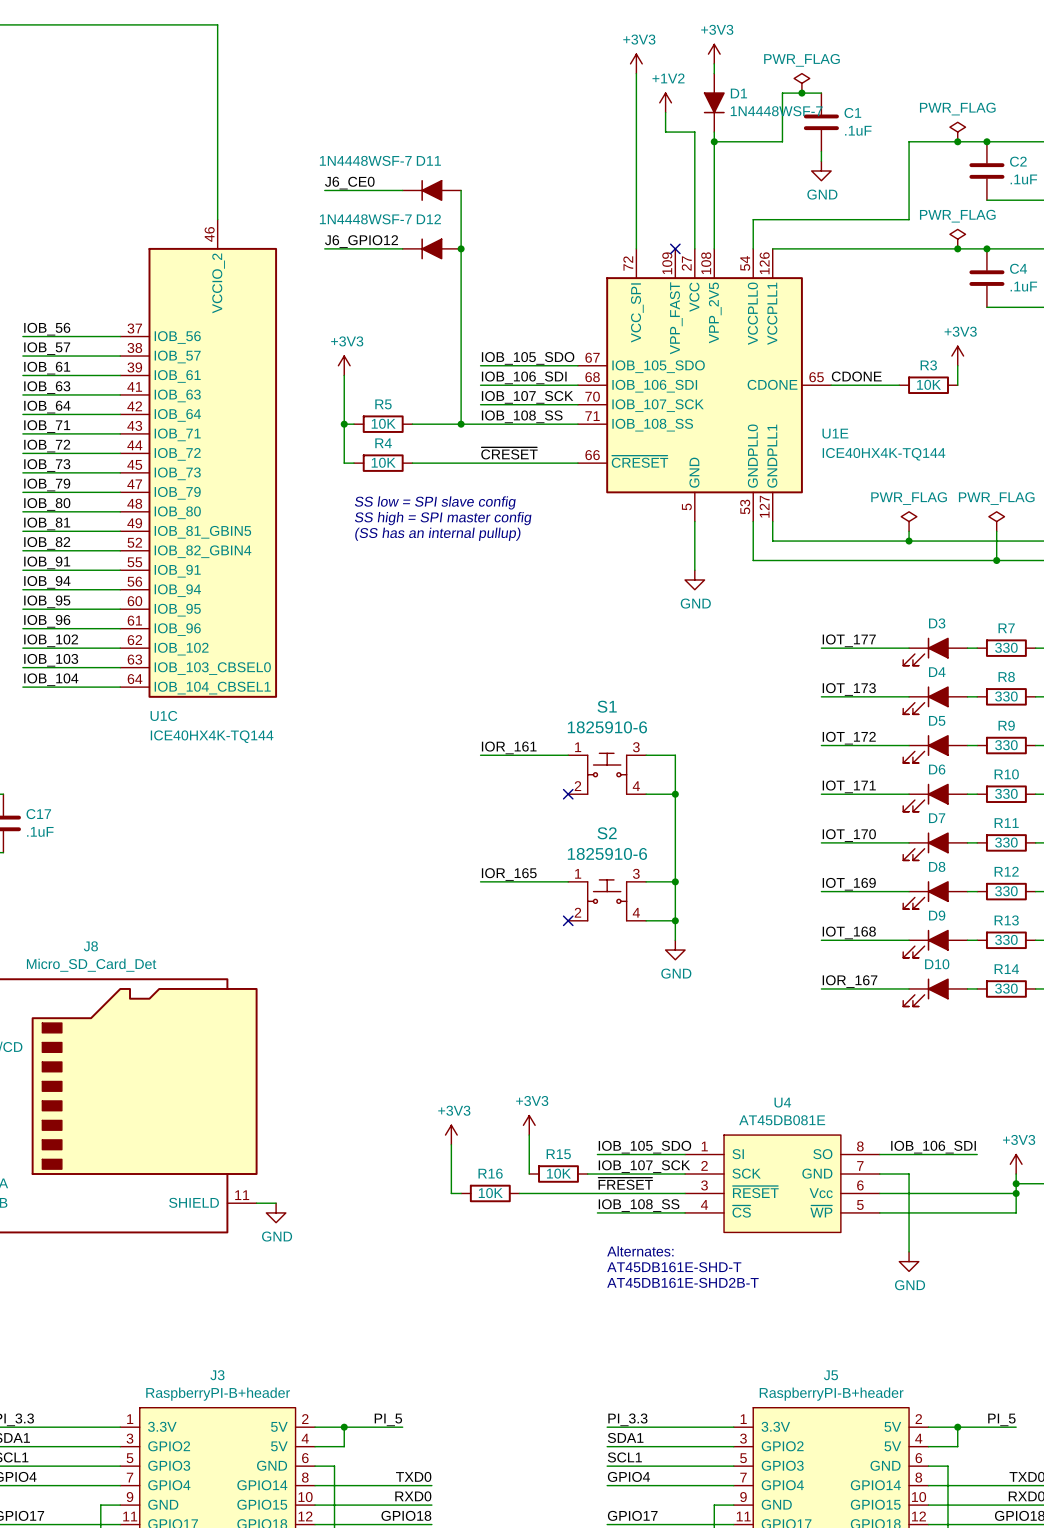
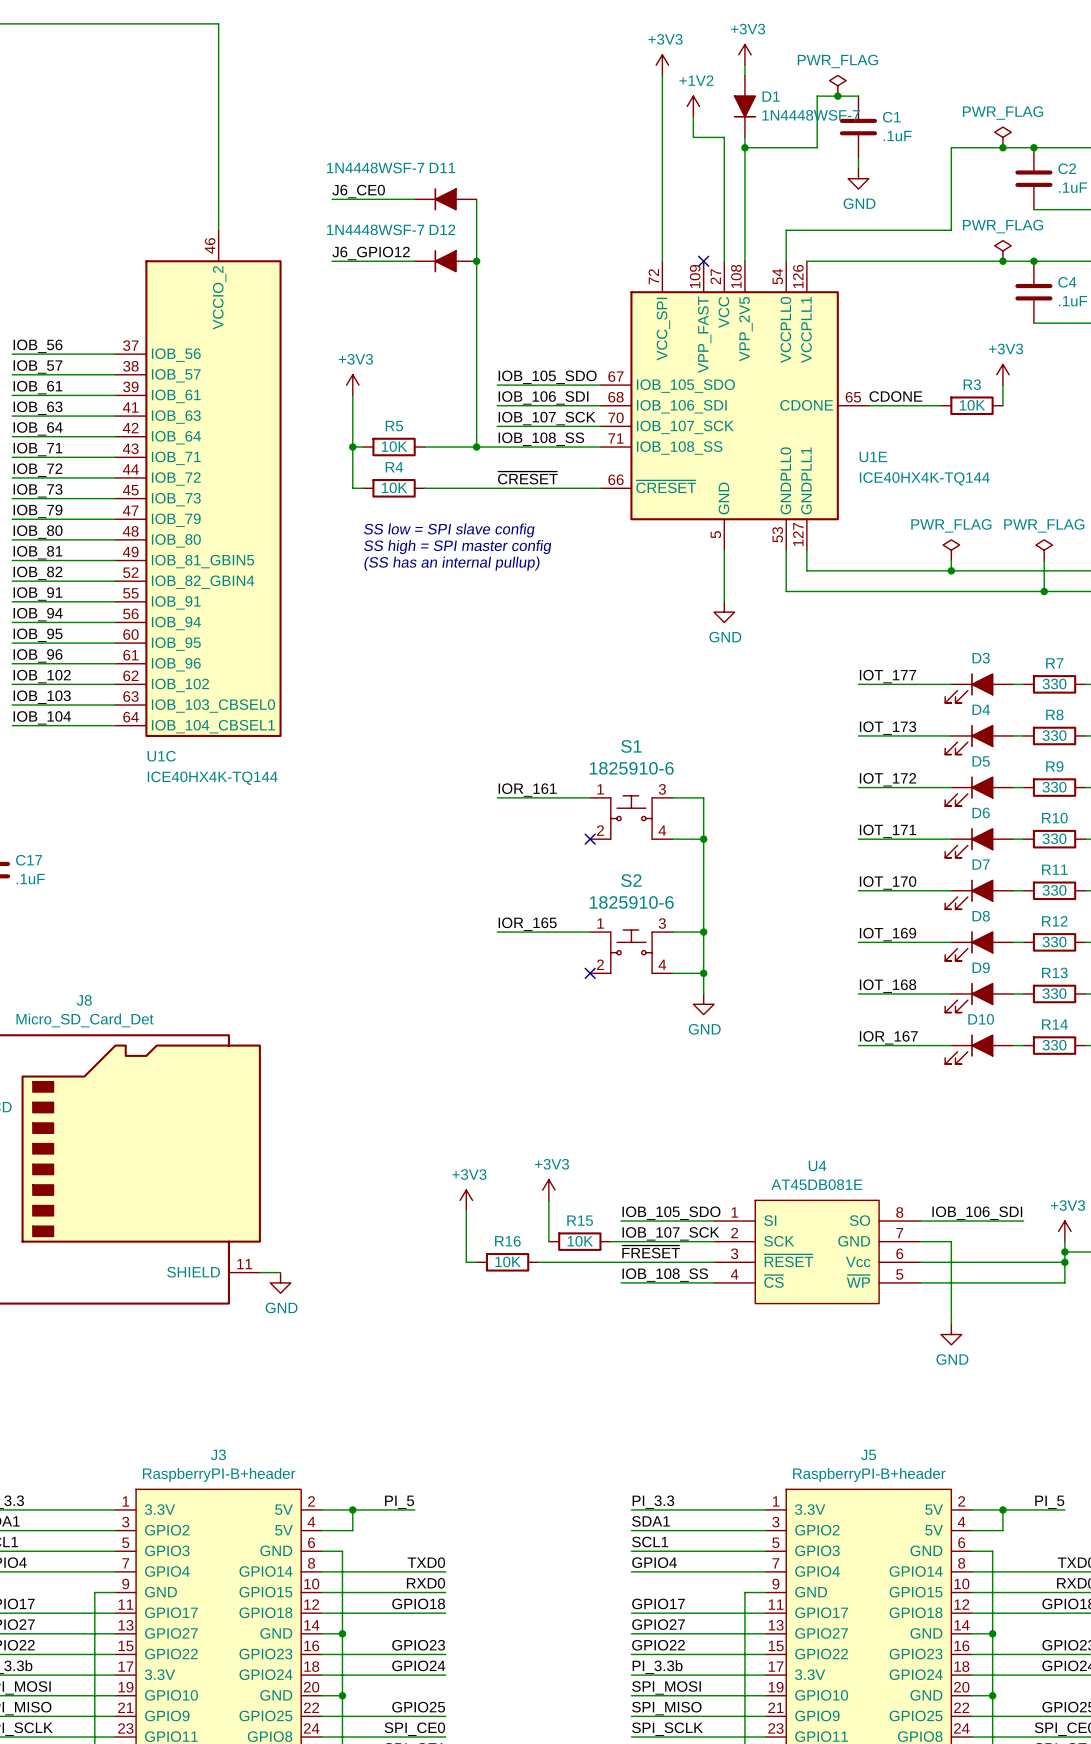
text: Alternates: (640, 1251) -> none
text: AT45DB161E-SHD-T (674, 1267) -> none
text: AT45DB161E-SHD2B-T (682, 1282) -> none

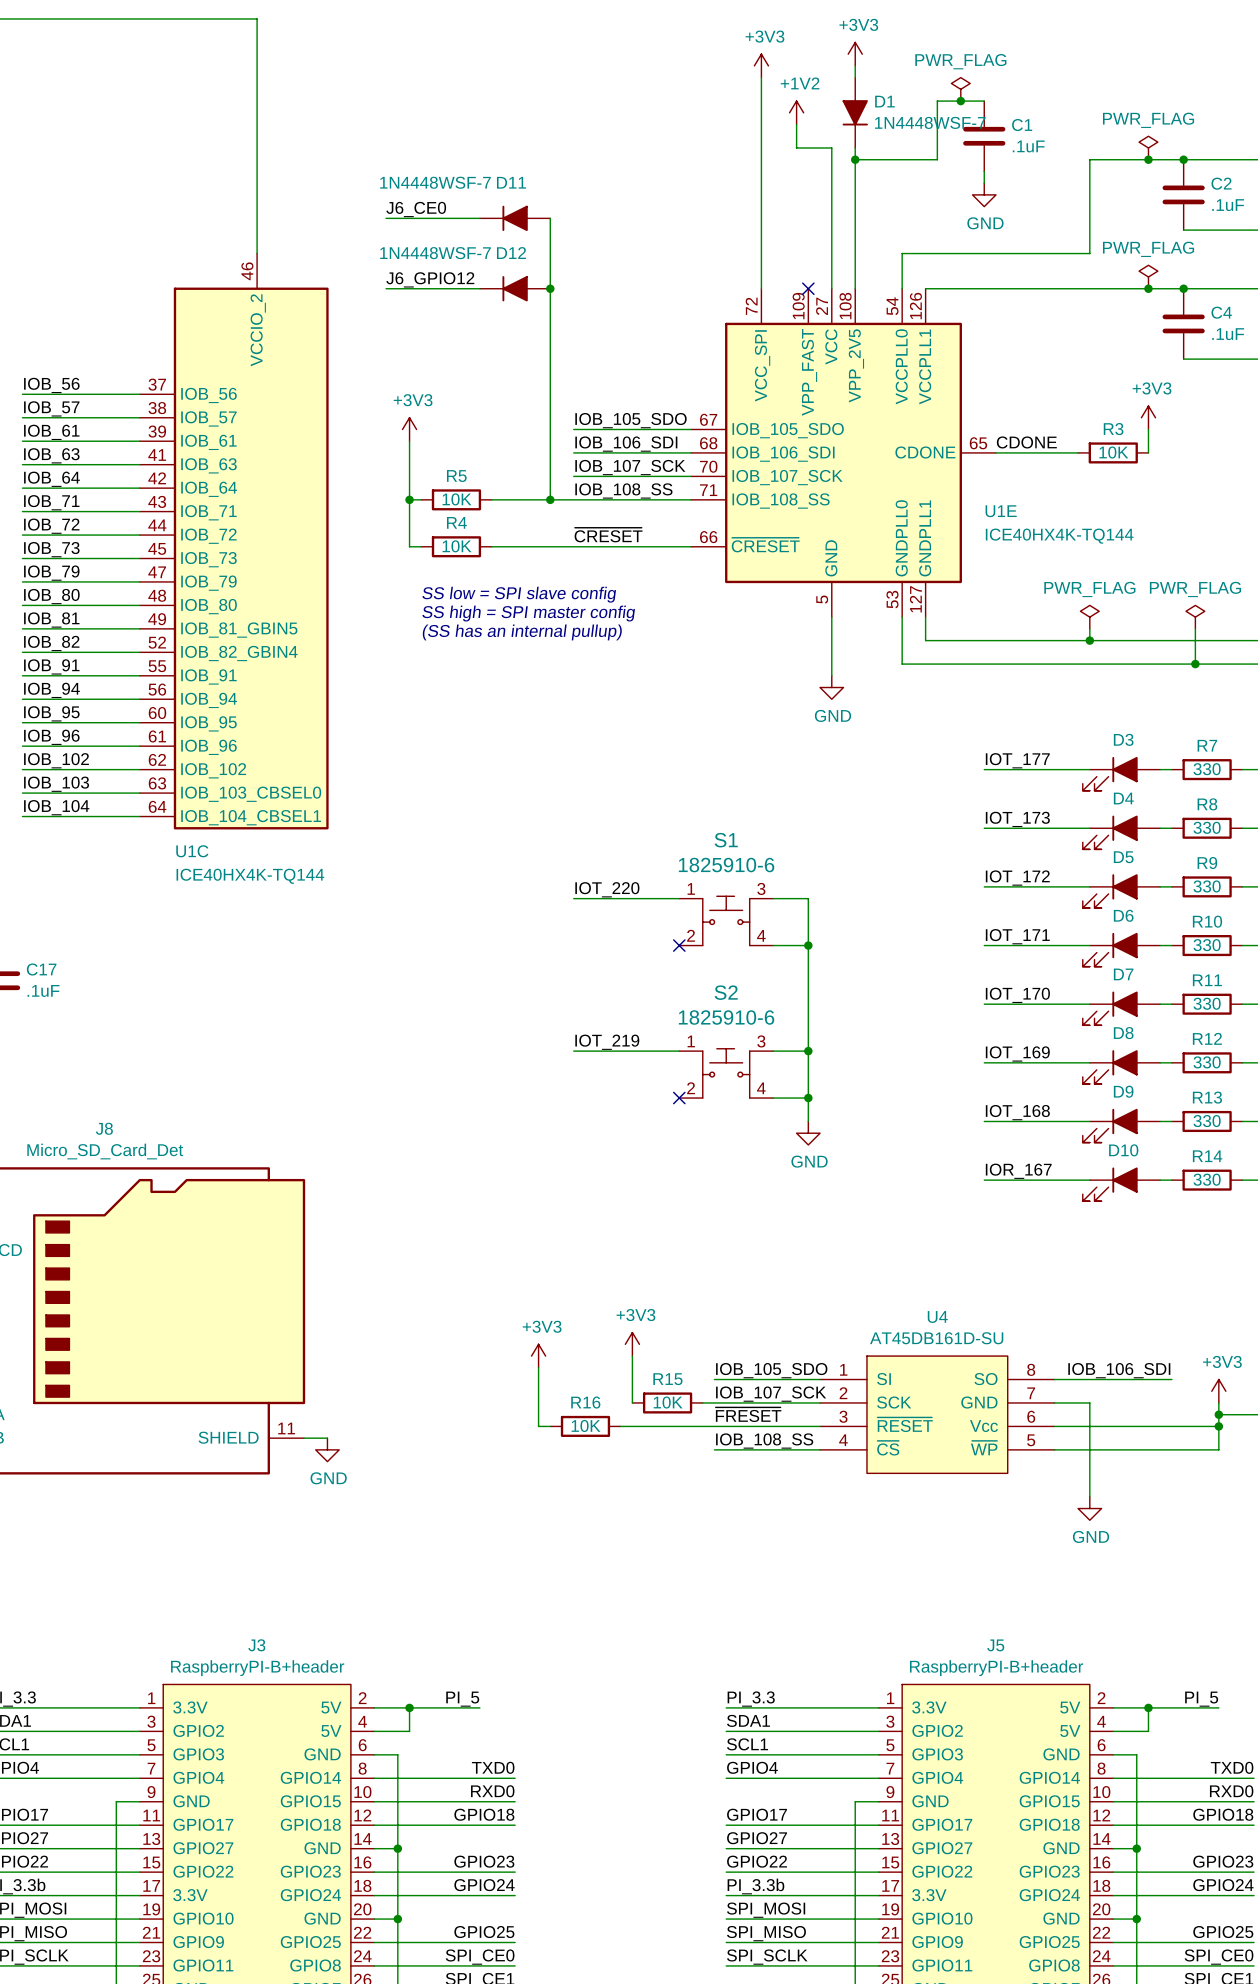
label: IOR_161 (527, 790) -> IOT_220 (607, 889)
label: IOR_165 (527, 924) -> IOT_219 (607, 1042)
U4 value: AT45DB081E (816, 1184) -> AT45DB161D-SU (936, 1338)

